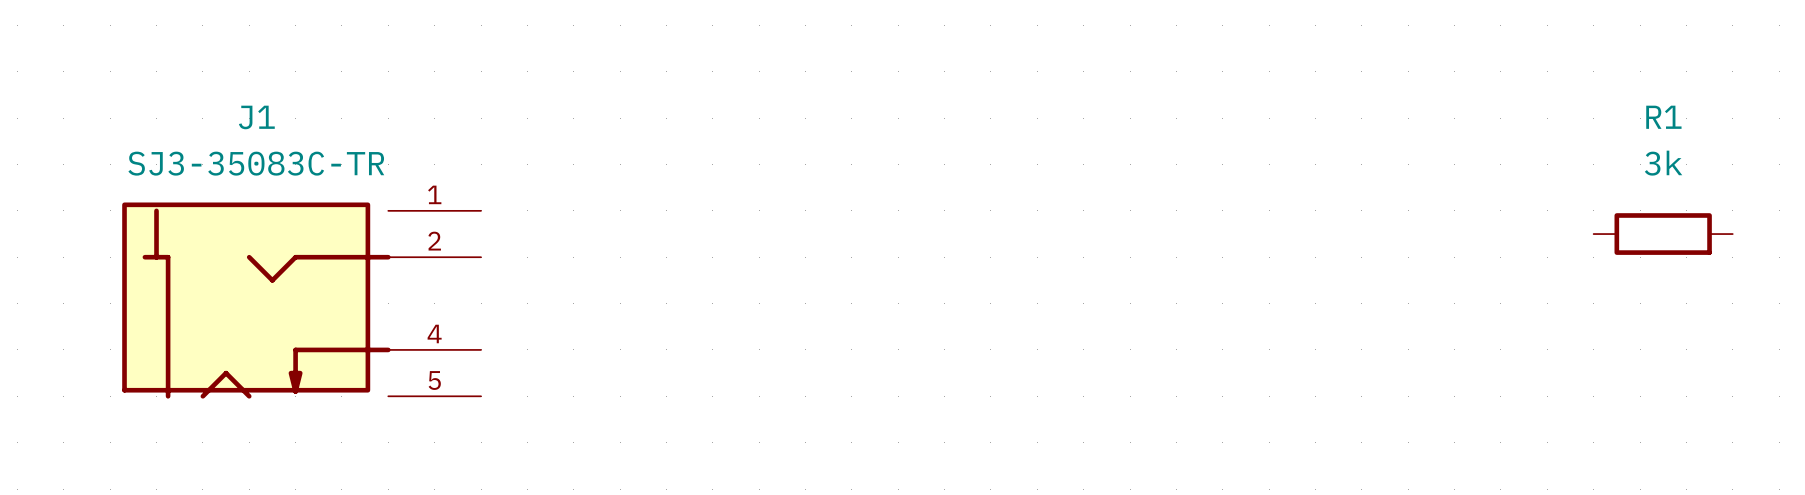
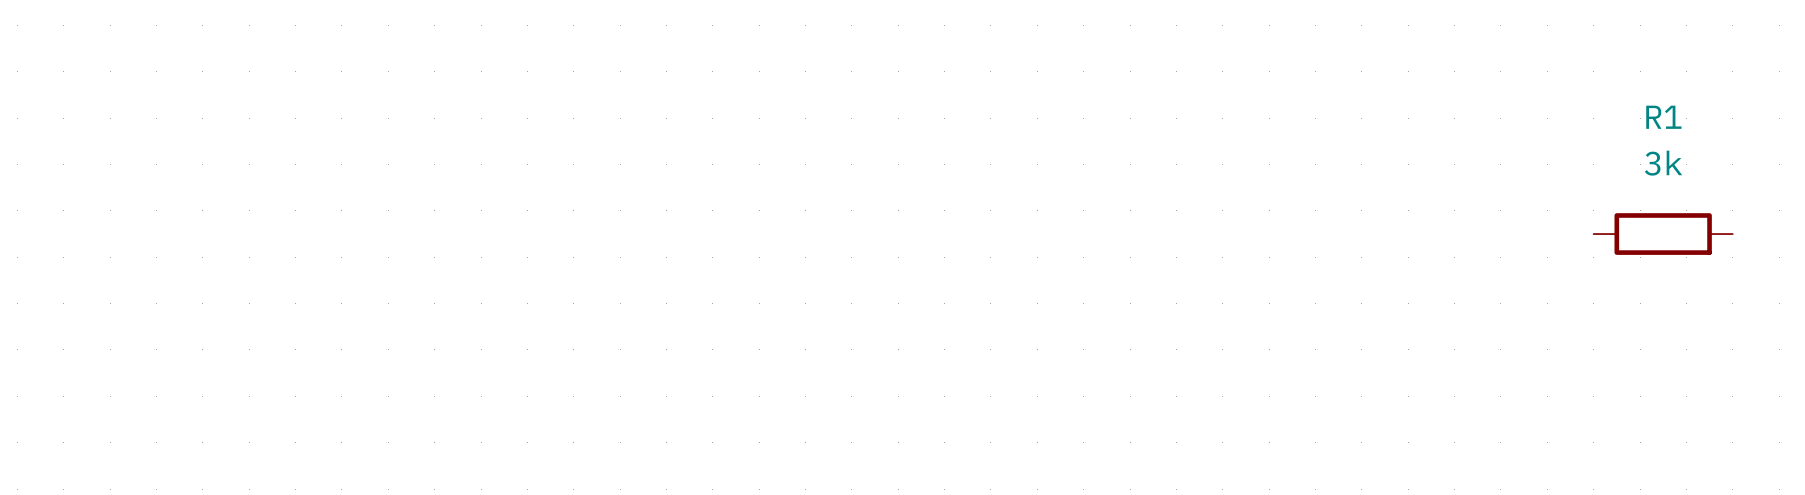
J1: SJ3-35083C-TR (301, 300) -> none

